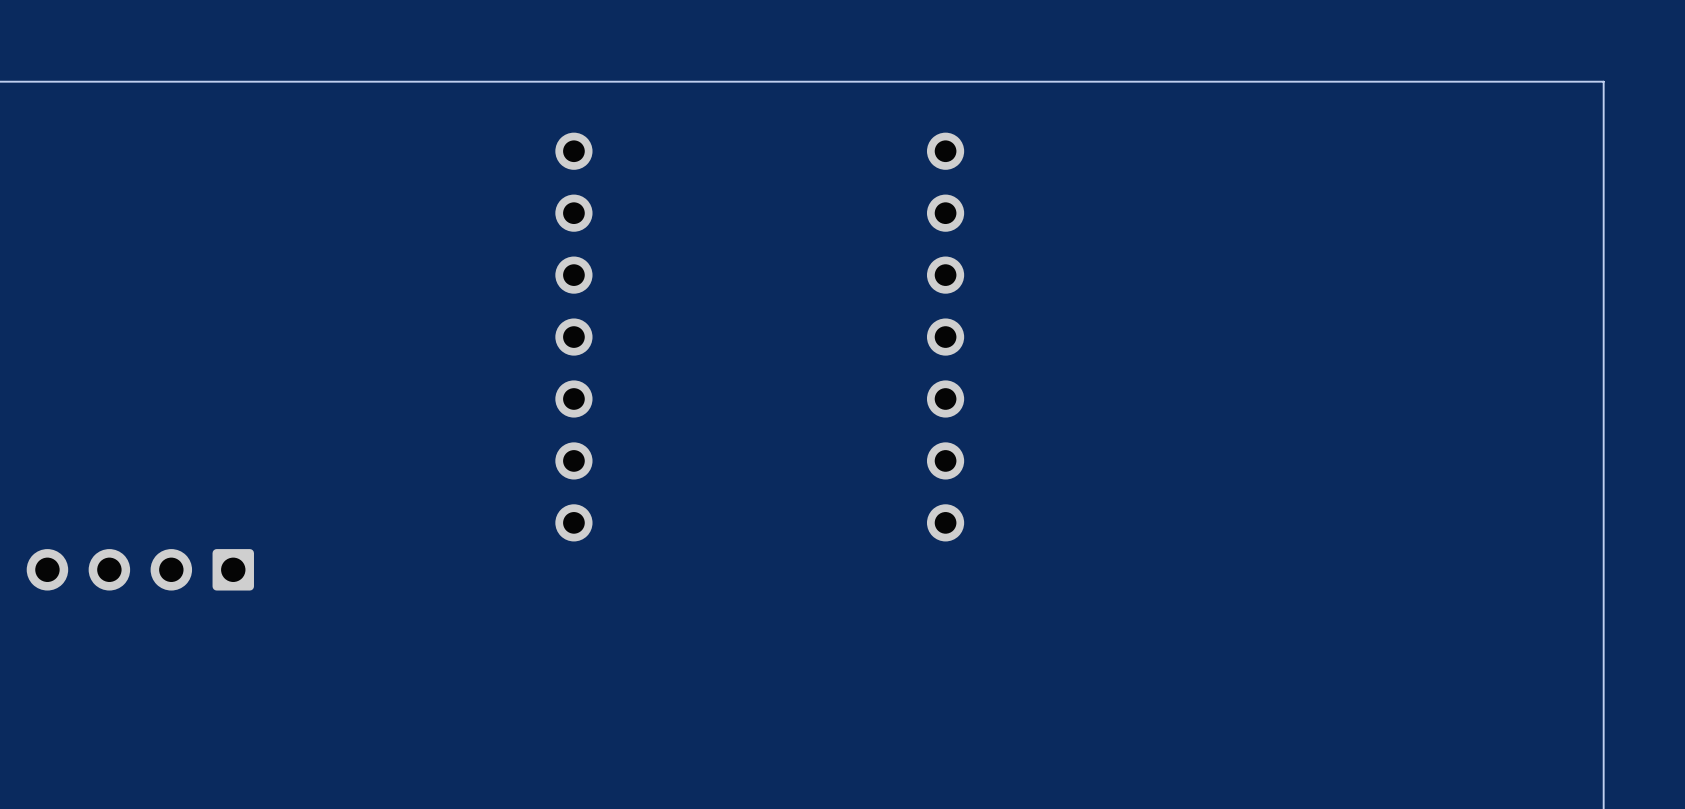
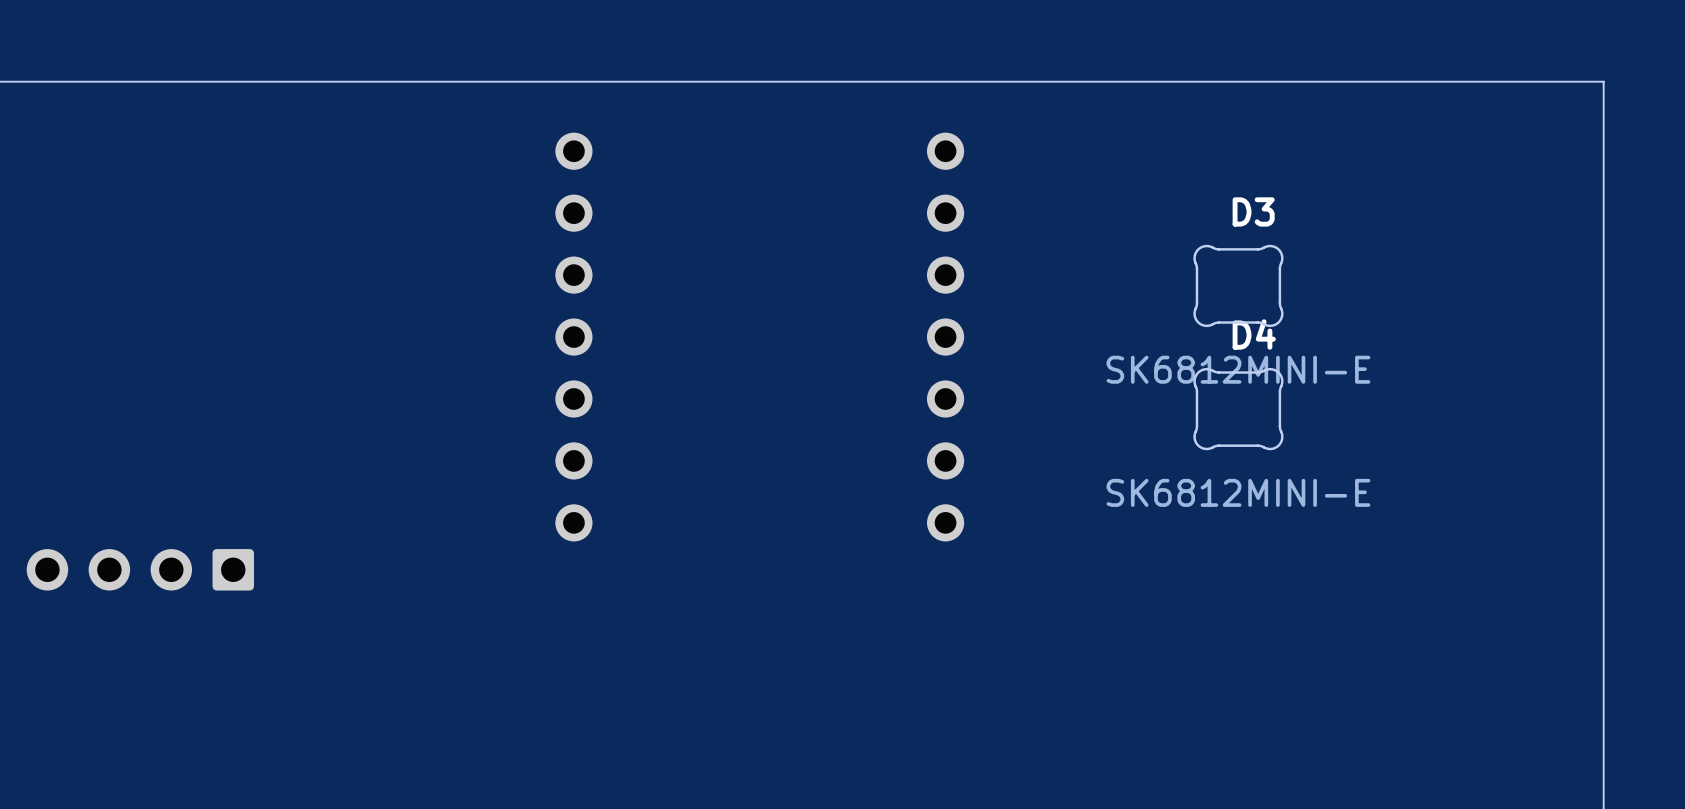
D3: none -> SK6812MINI-E (1238, 285)
D4: none -> SK6812MINI-E (1238, 409)

